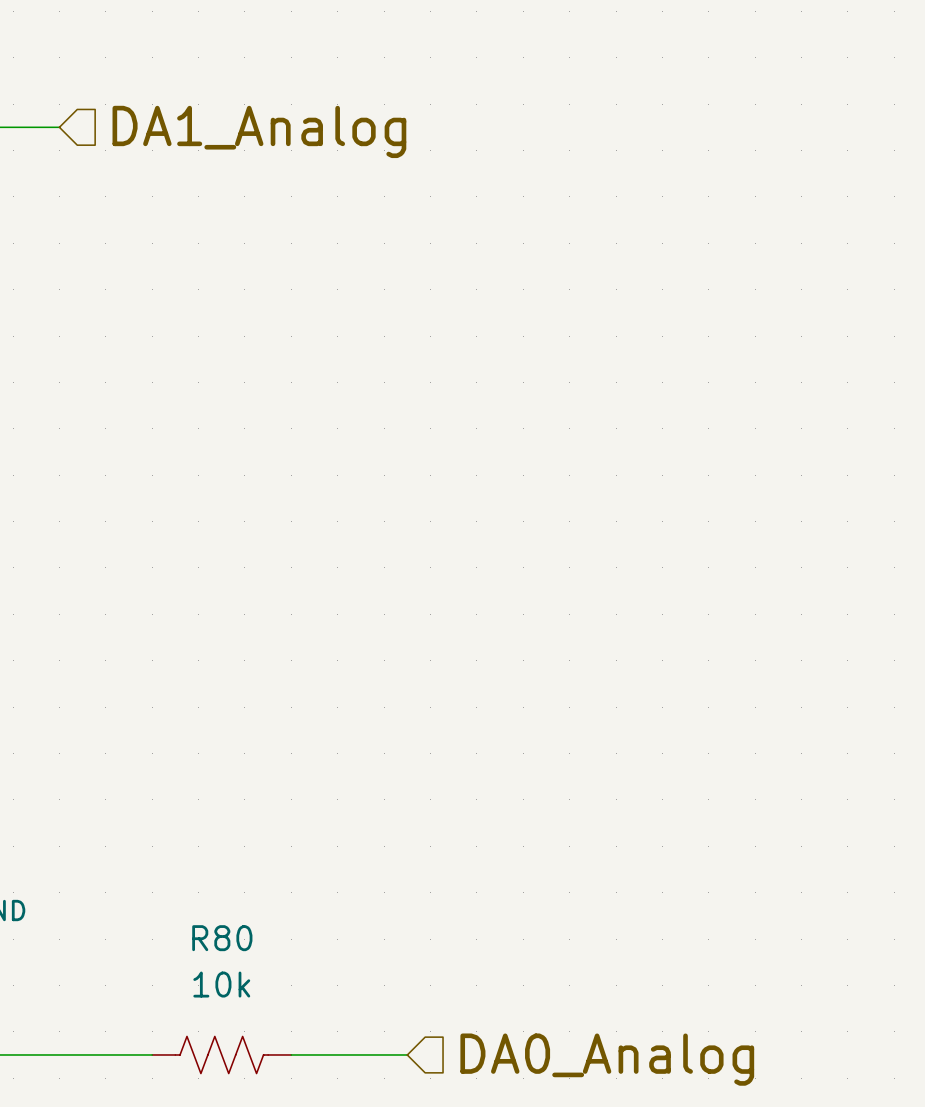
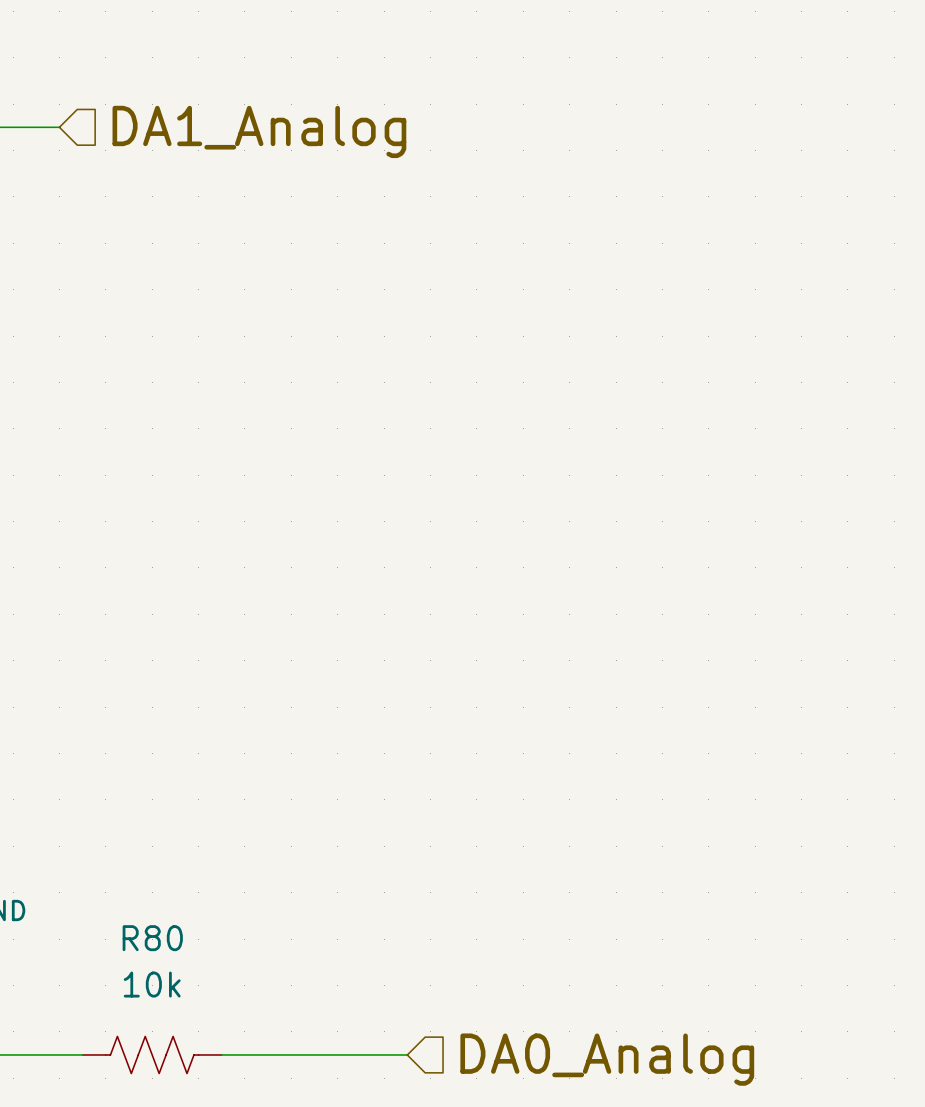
wire: (82, 1054) (152, 1054) -> (221, 1054) (291, 1054)
R80 position: (221, 1054) -> (152, 1054)

